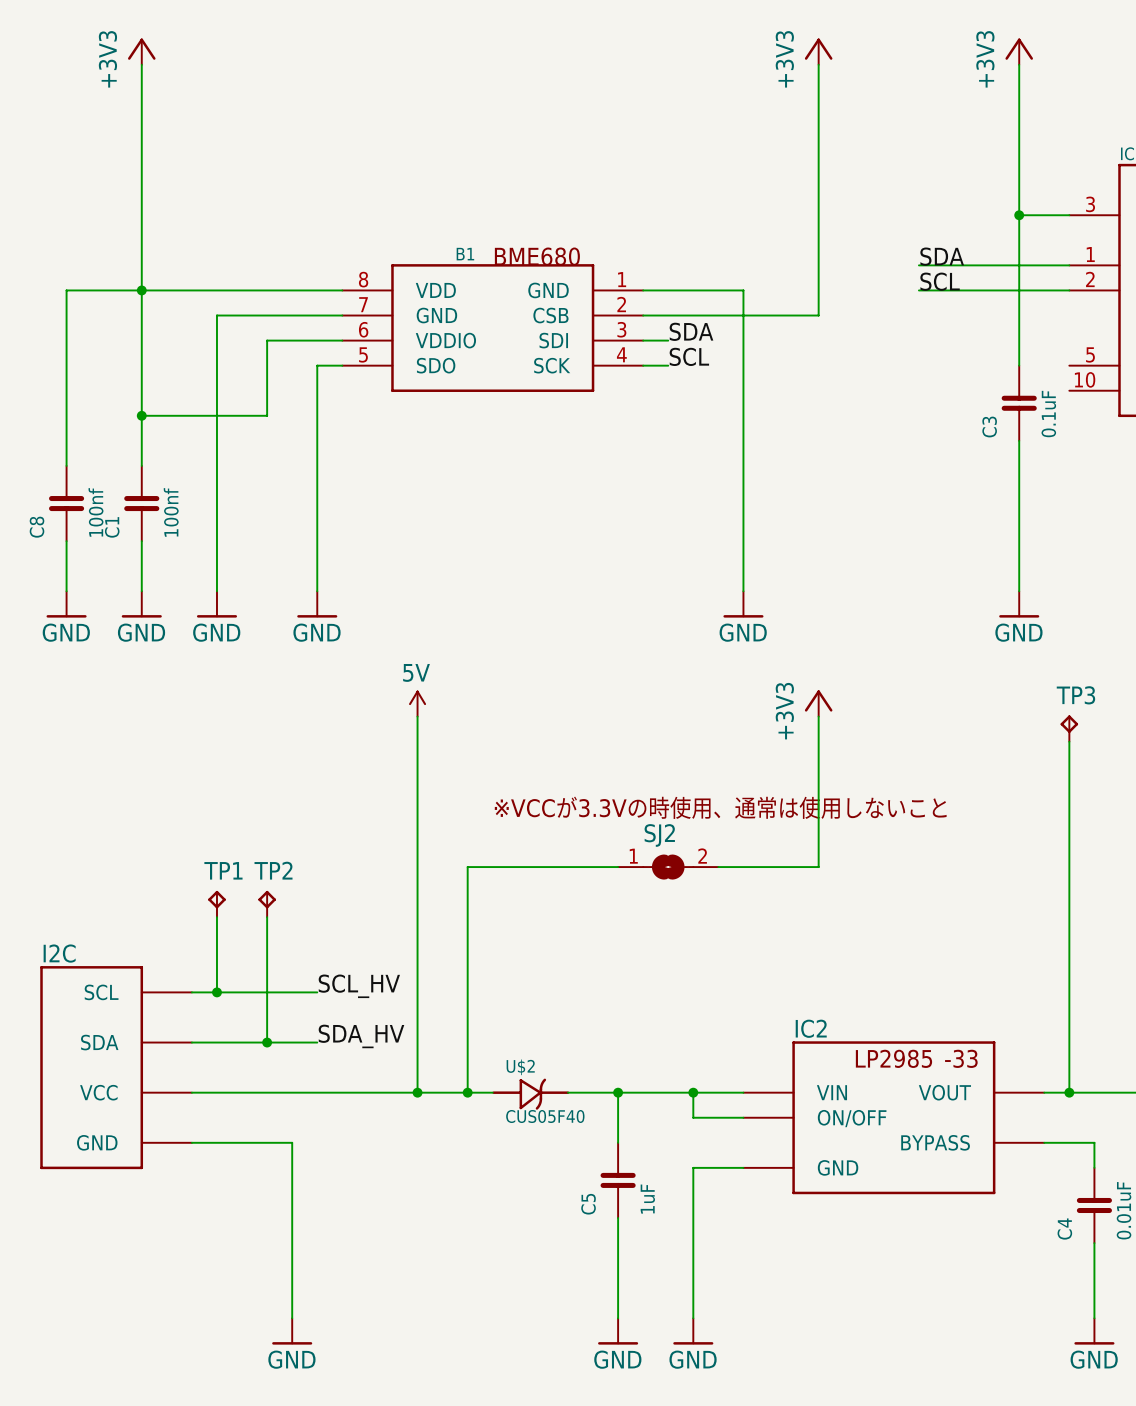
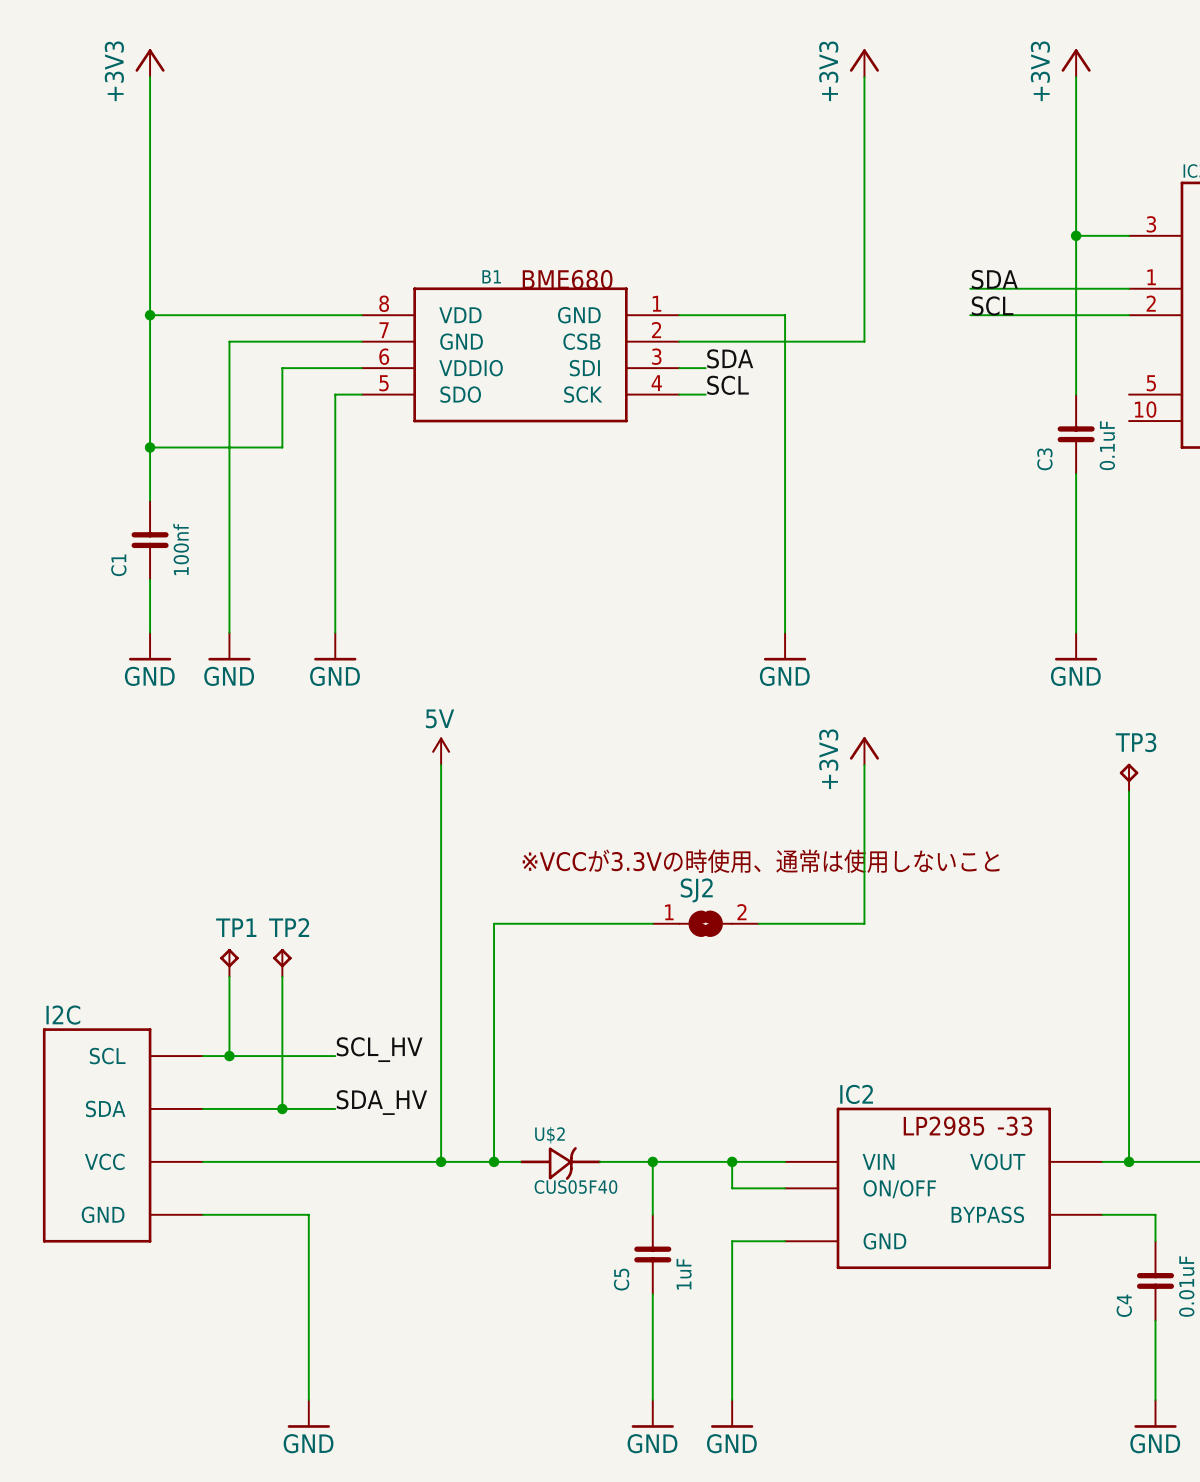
wire: (141, 290) (66, 290) (66, 465) -> none
C8: 100nf (66, 503) -> none
wire: (66, 541) (66, 591) -> none
power symbol: GND (66, 604) -> none

